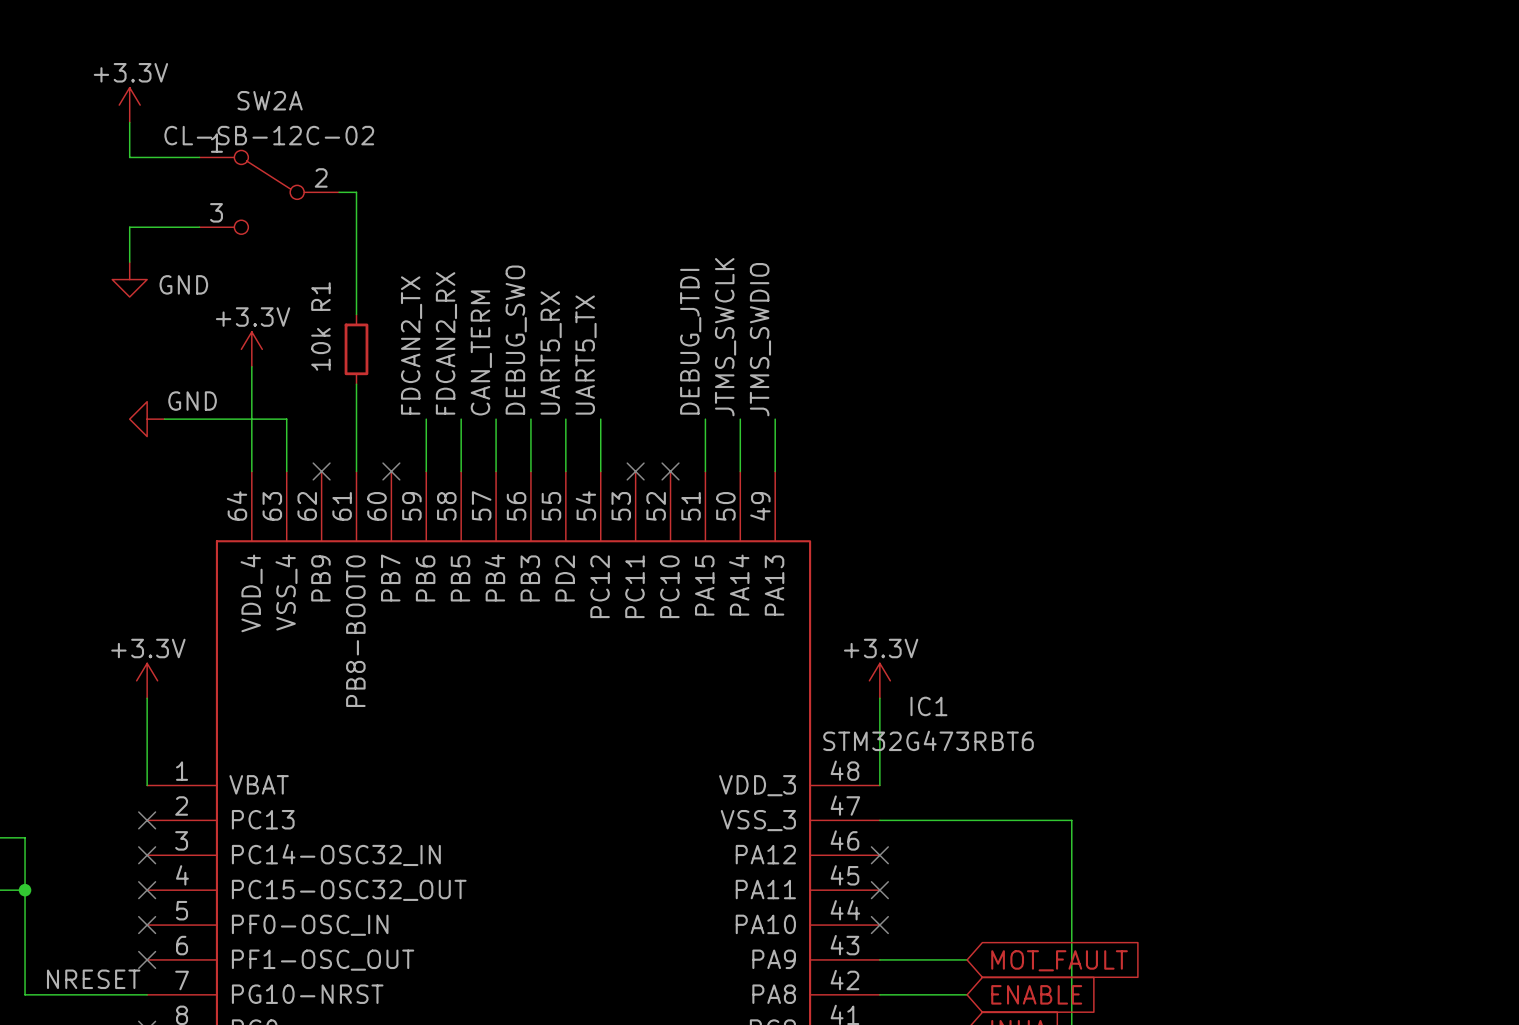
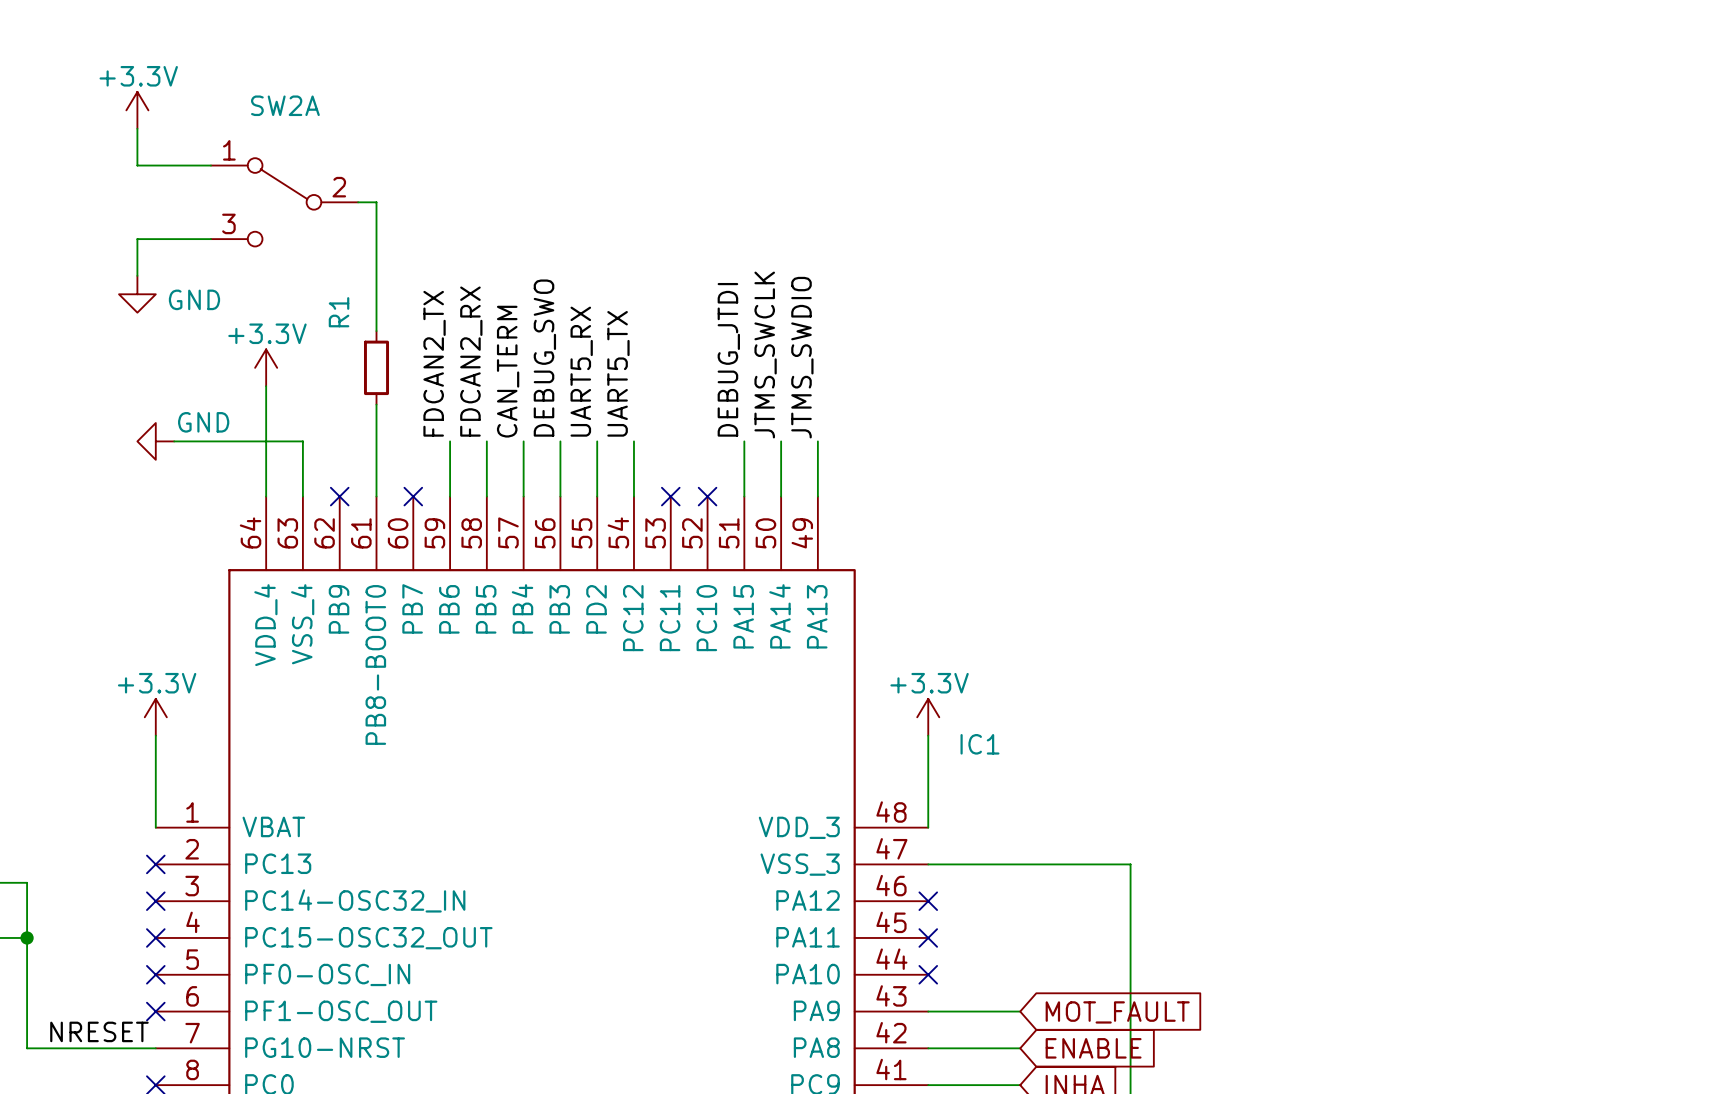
SW2A value: CL-SB-12C-02 (269, 135) -> none
R1 value: 10k (320, 349) -> none
IC1 value: STM32G473RBT6 (928, 740) -> none

